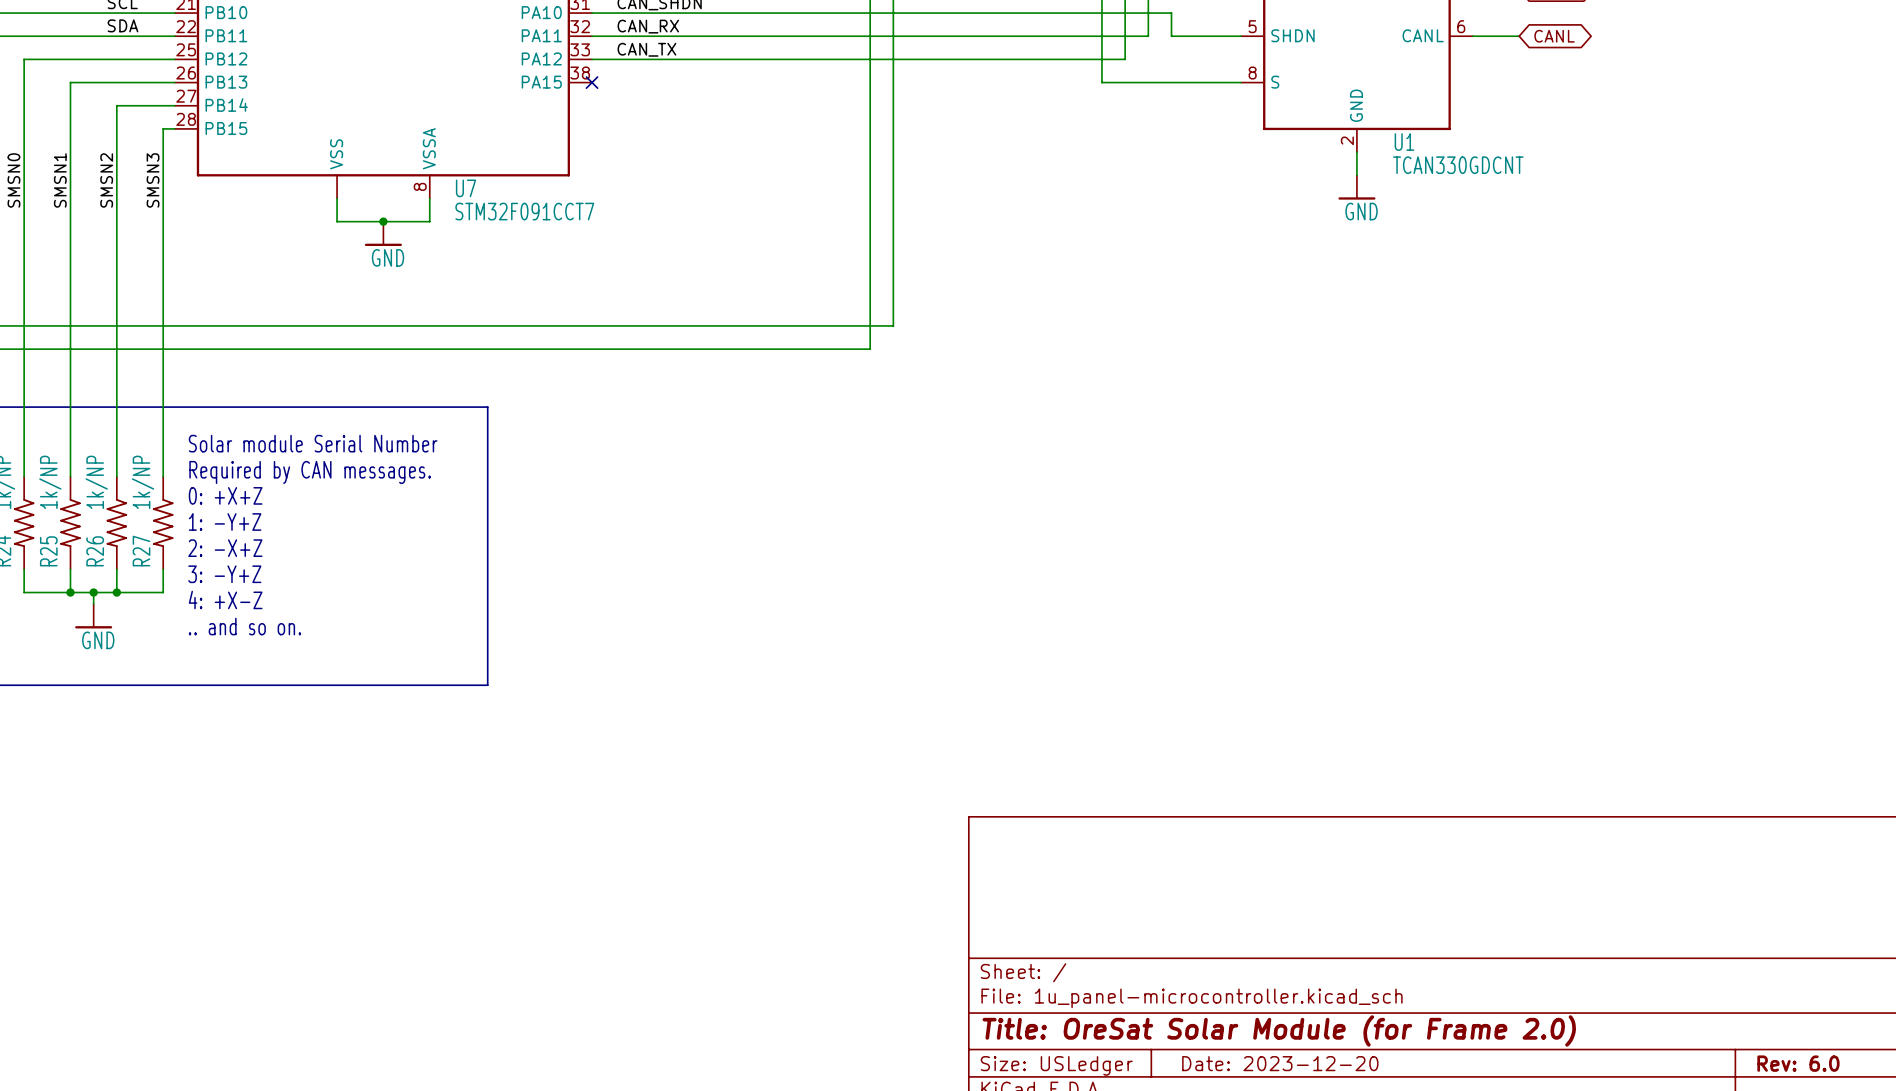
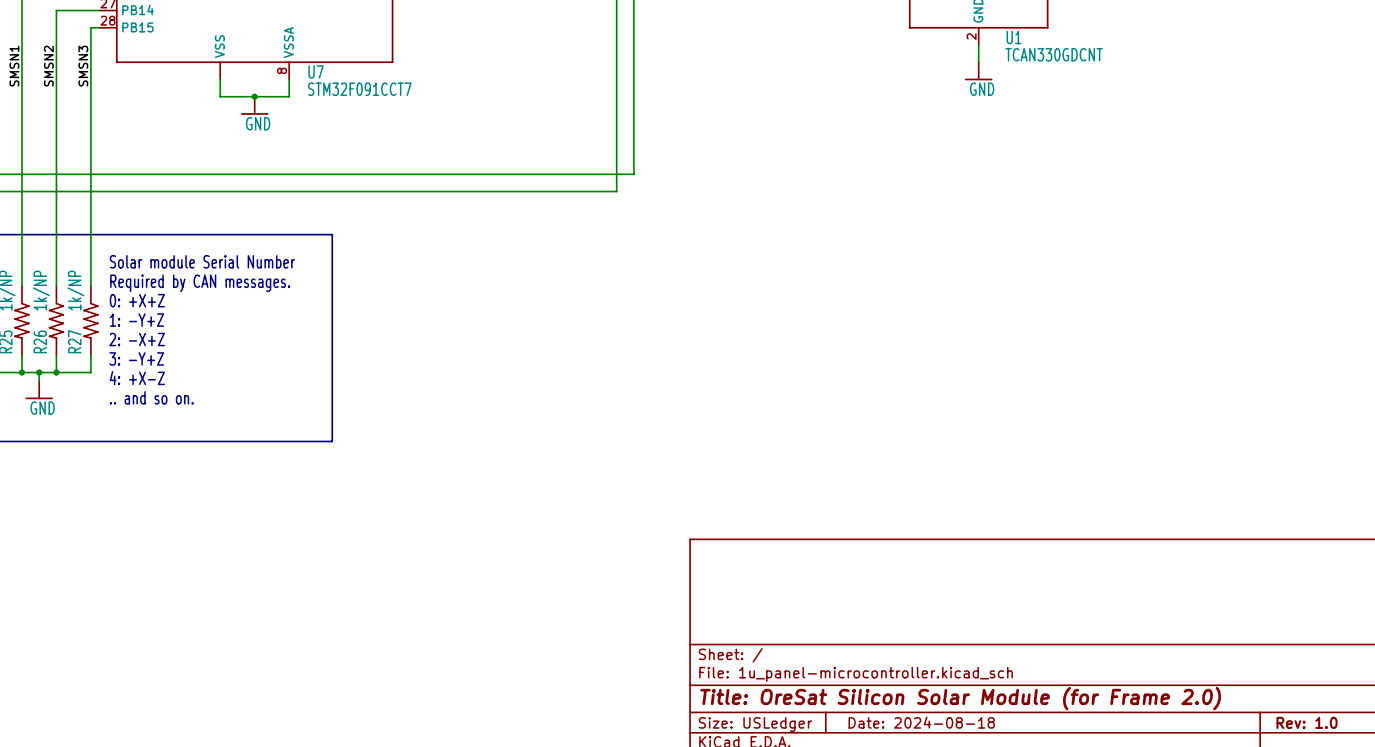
title block: Title: OreSat Solar Module (for Frame 2.0) (1279, 1030) -> Title: OreSat Silicon Solar Module (for Frame 2.0) (960, 698)
title block: Date: 2023-12-20 (1280, 1063) -> Date: 2024-08-18 (921, 722)
title block: Rev: 6.0 (1798, 1063) -> Rev: 1.0 (1307, 722)

